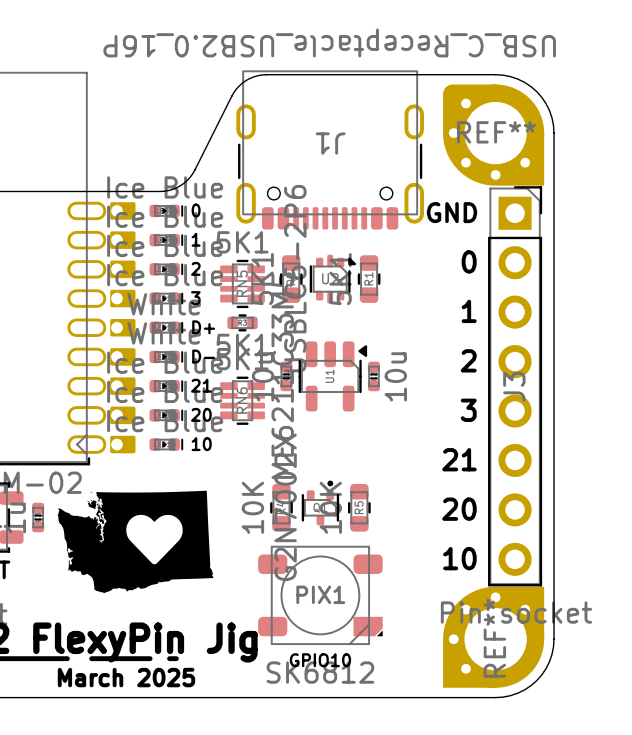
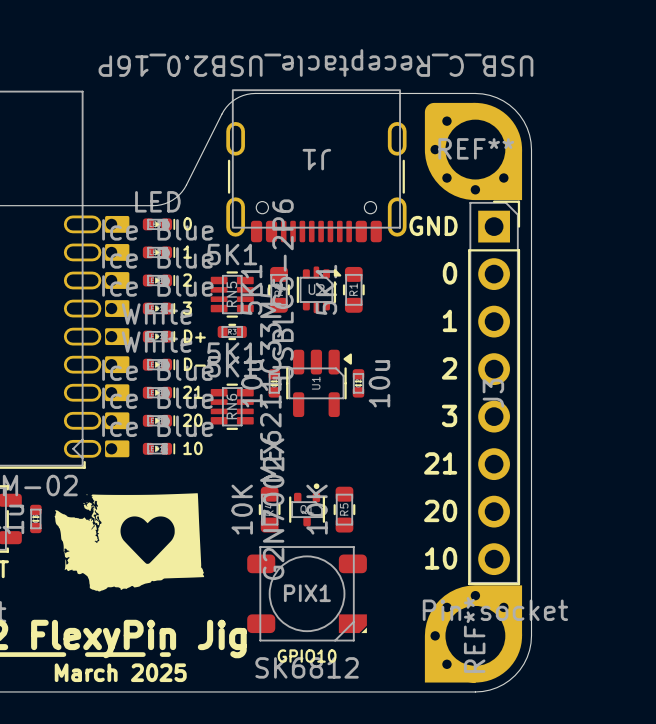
part value: Ice Blue (165, 187) -> LED (157, 201)

